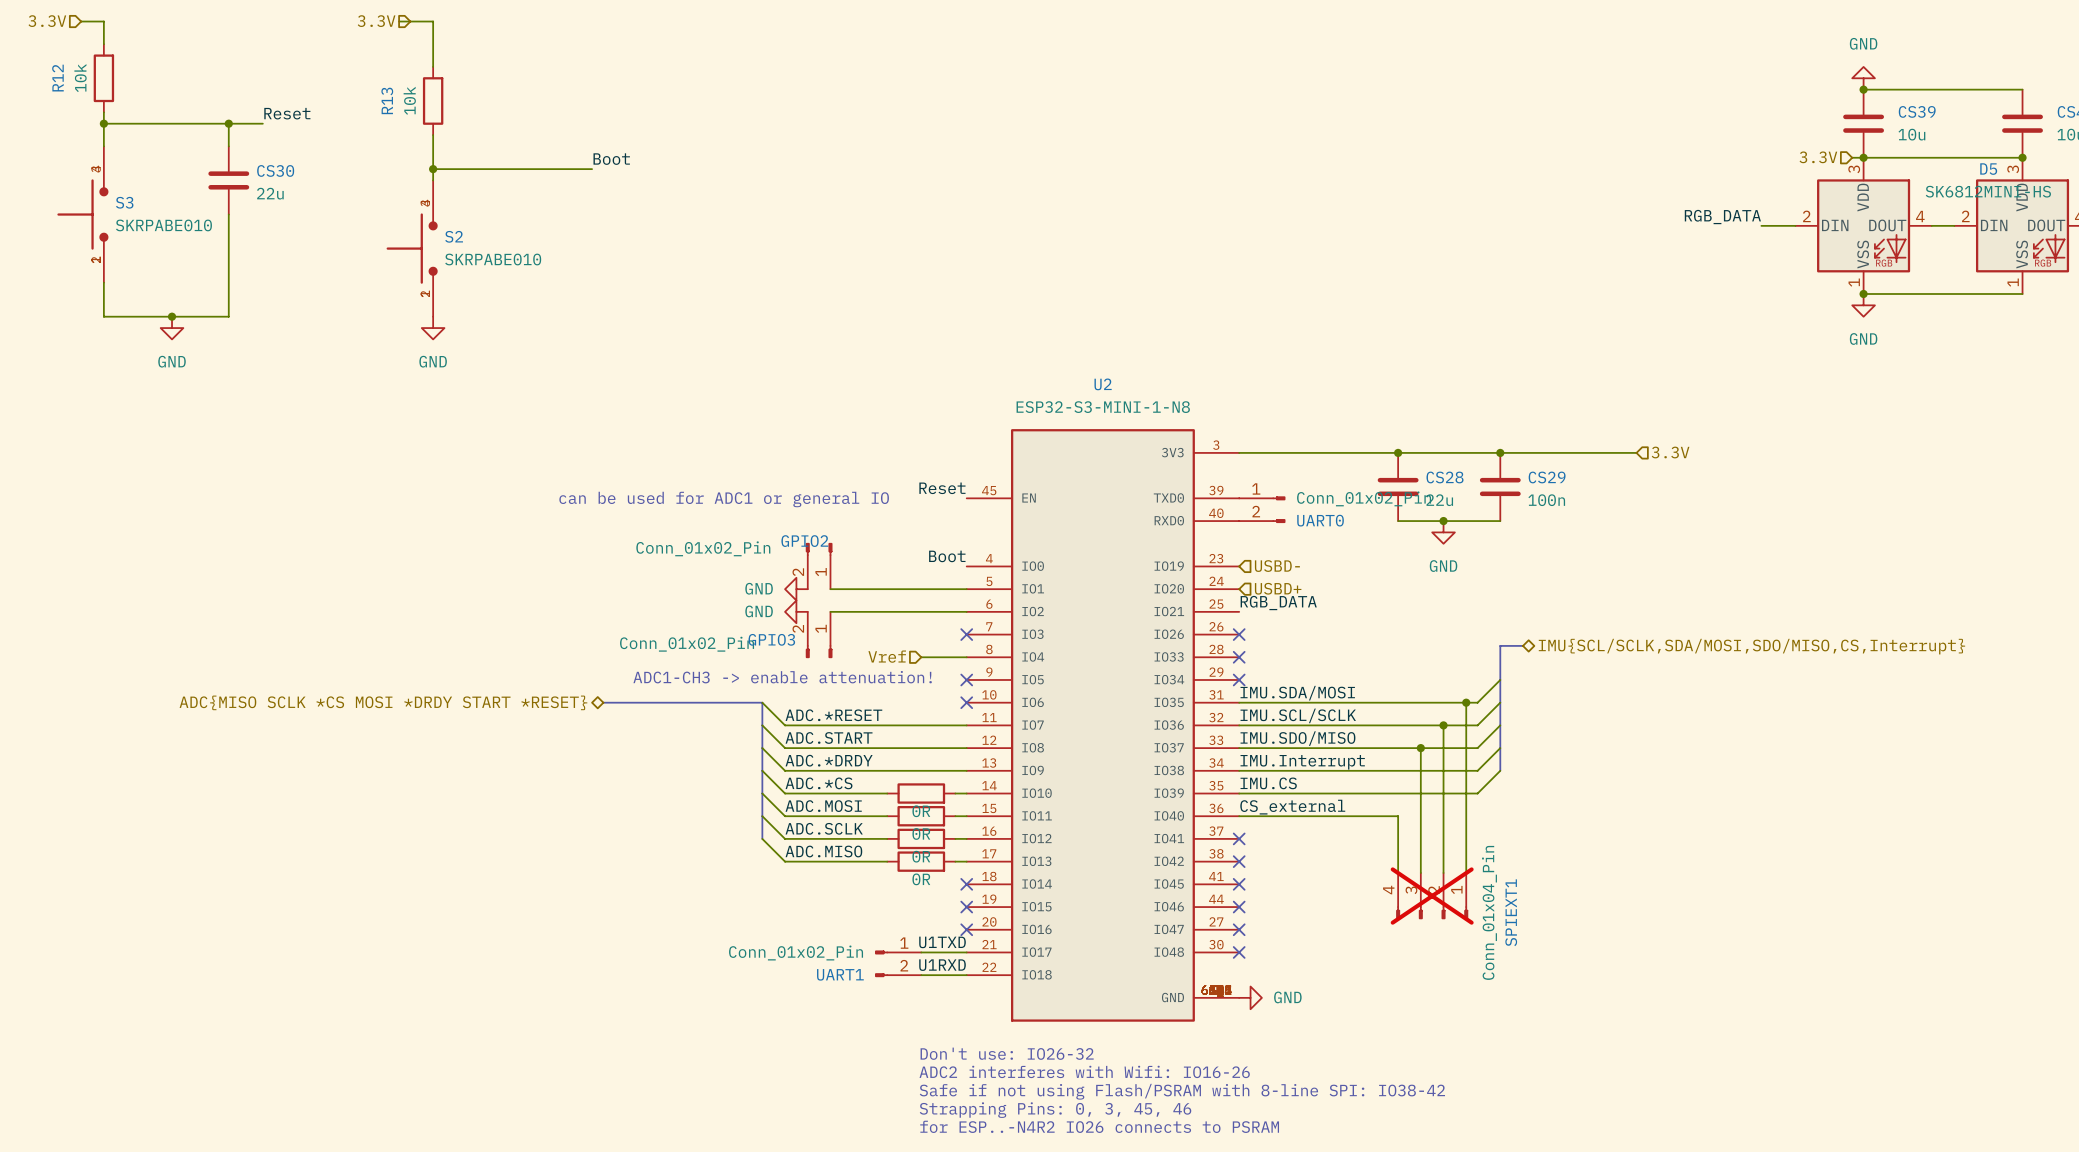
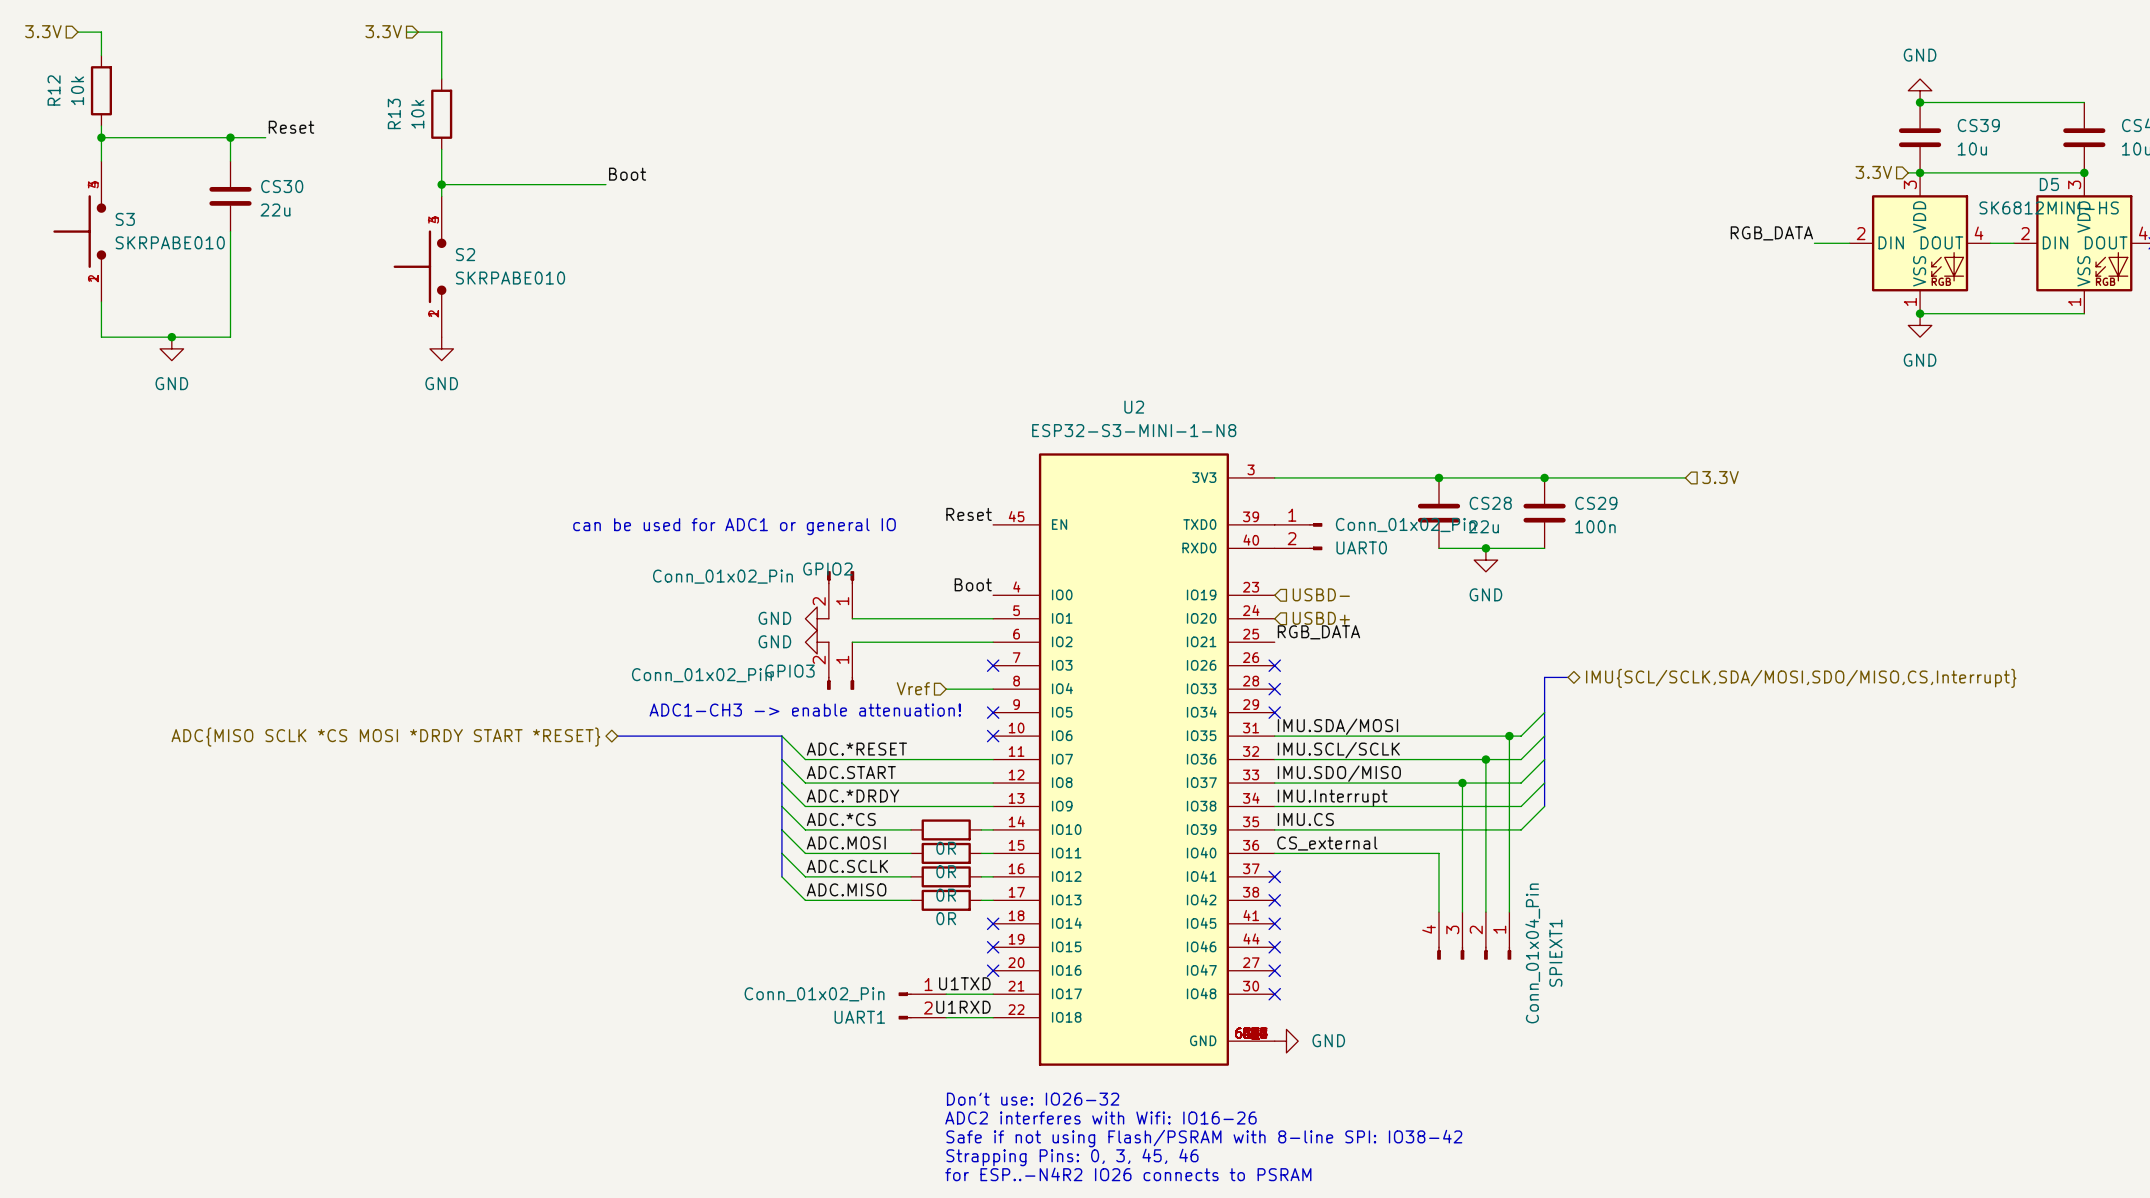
SPIEXT1 do-not-place cross: (1432, 896) -> none

